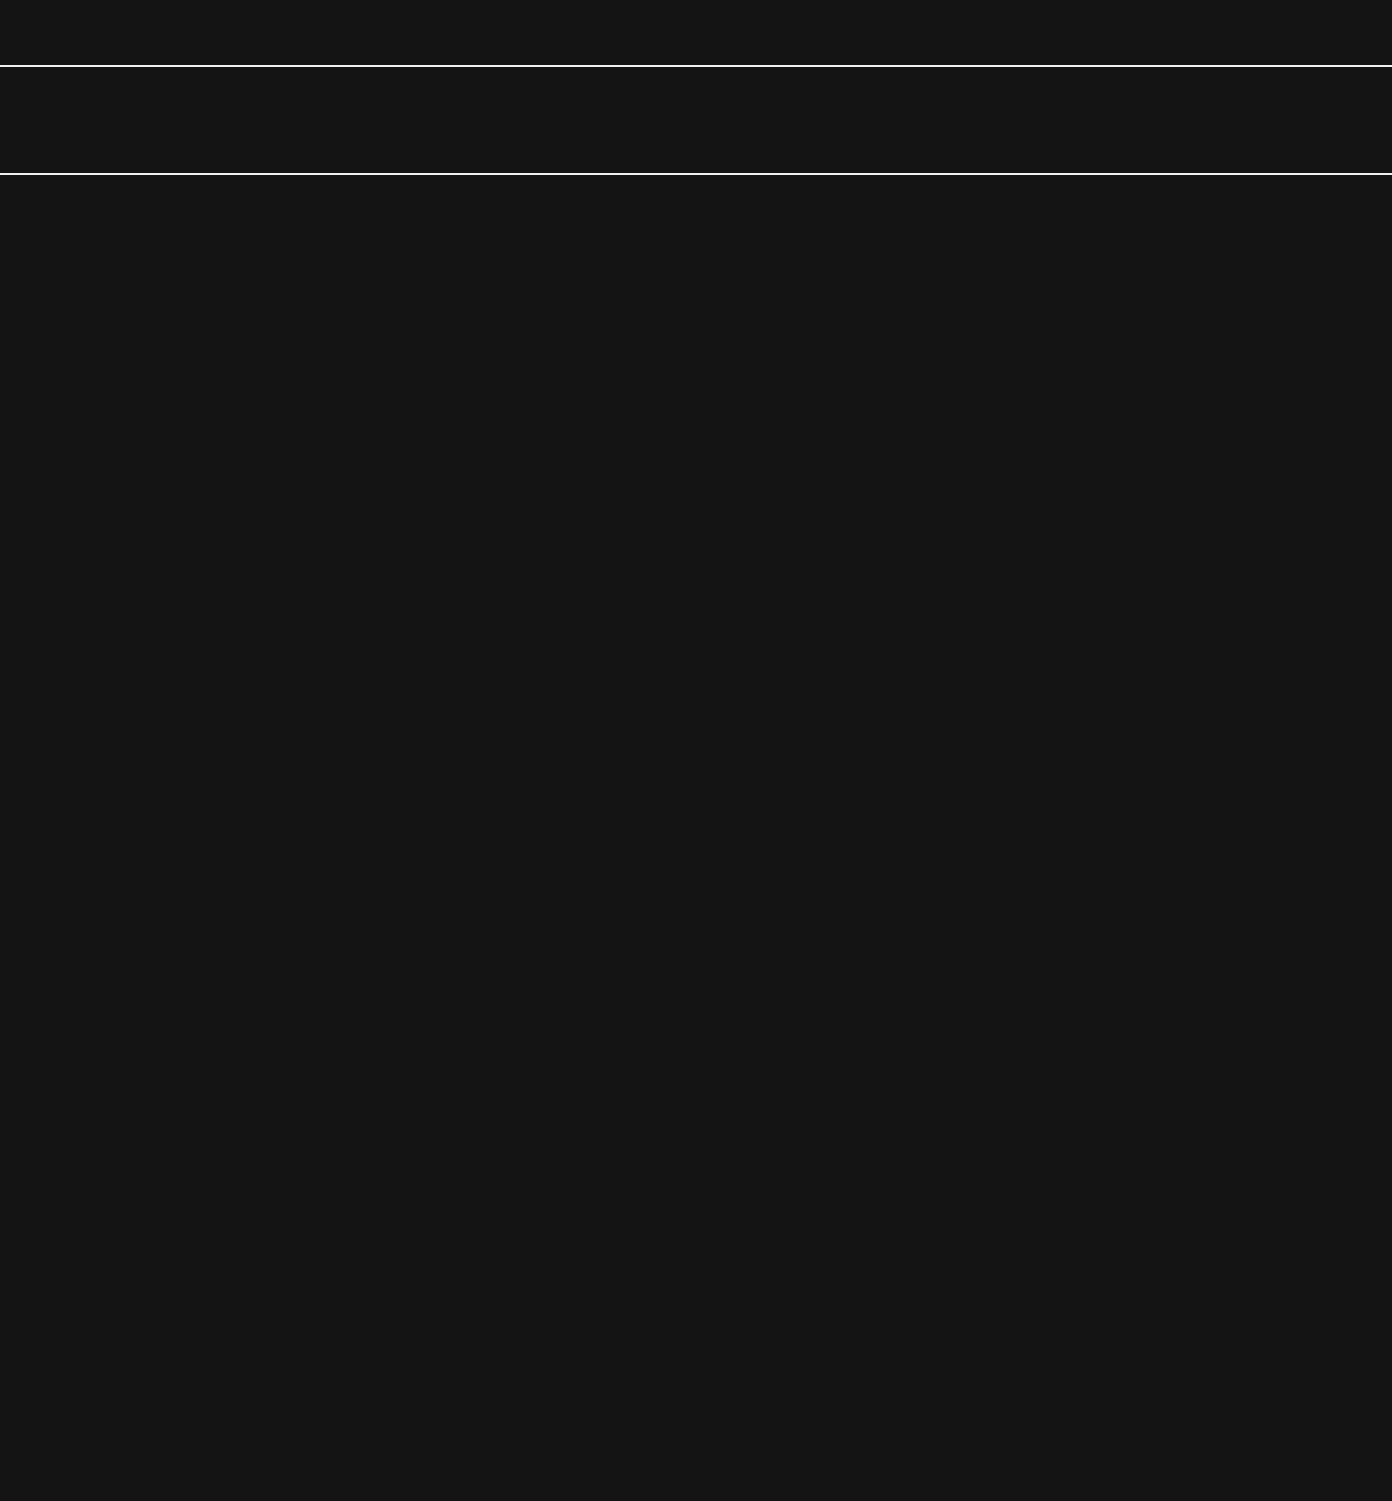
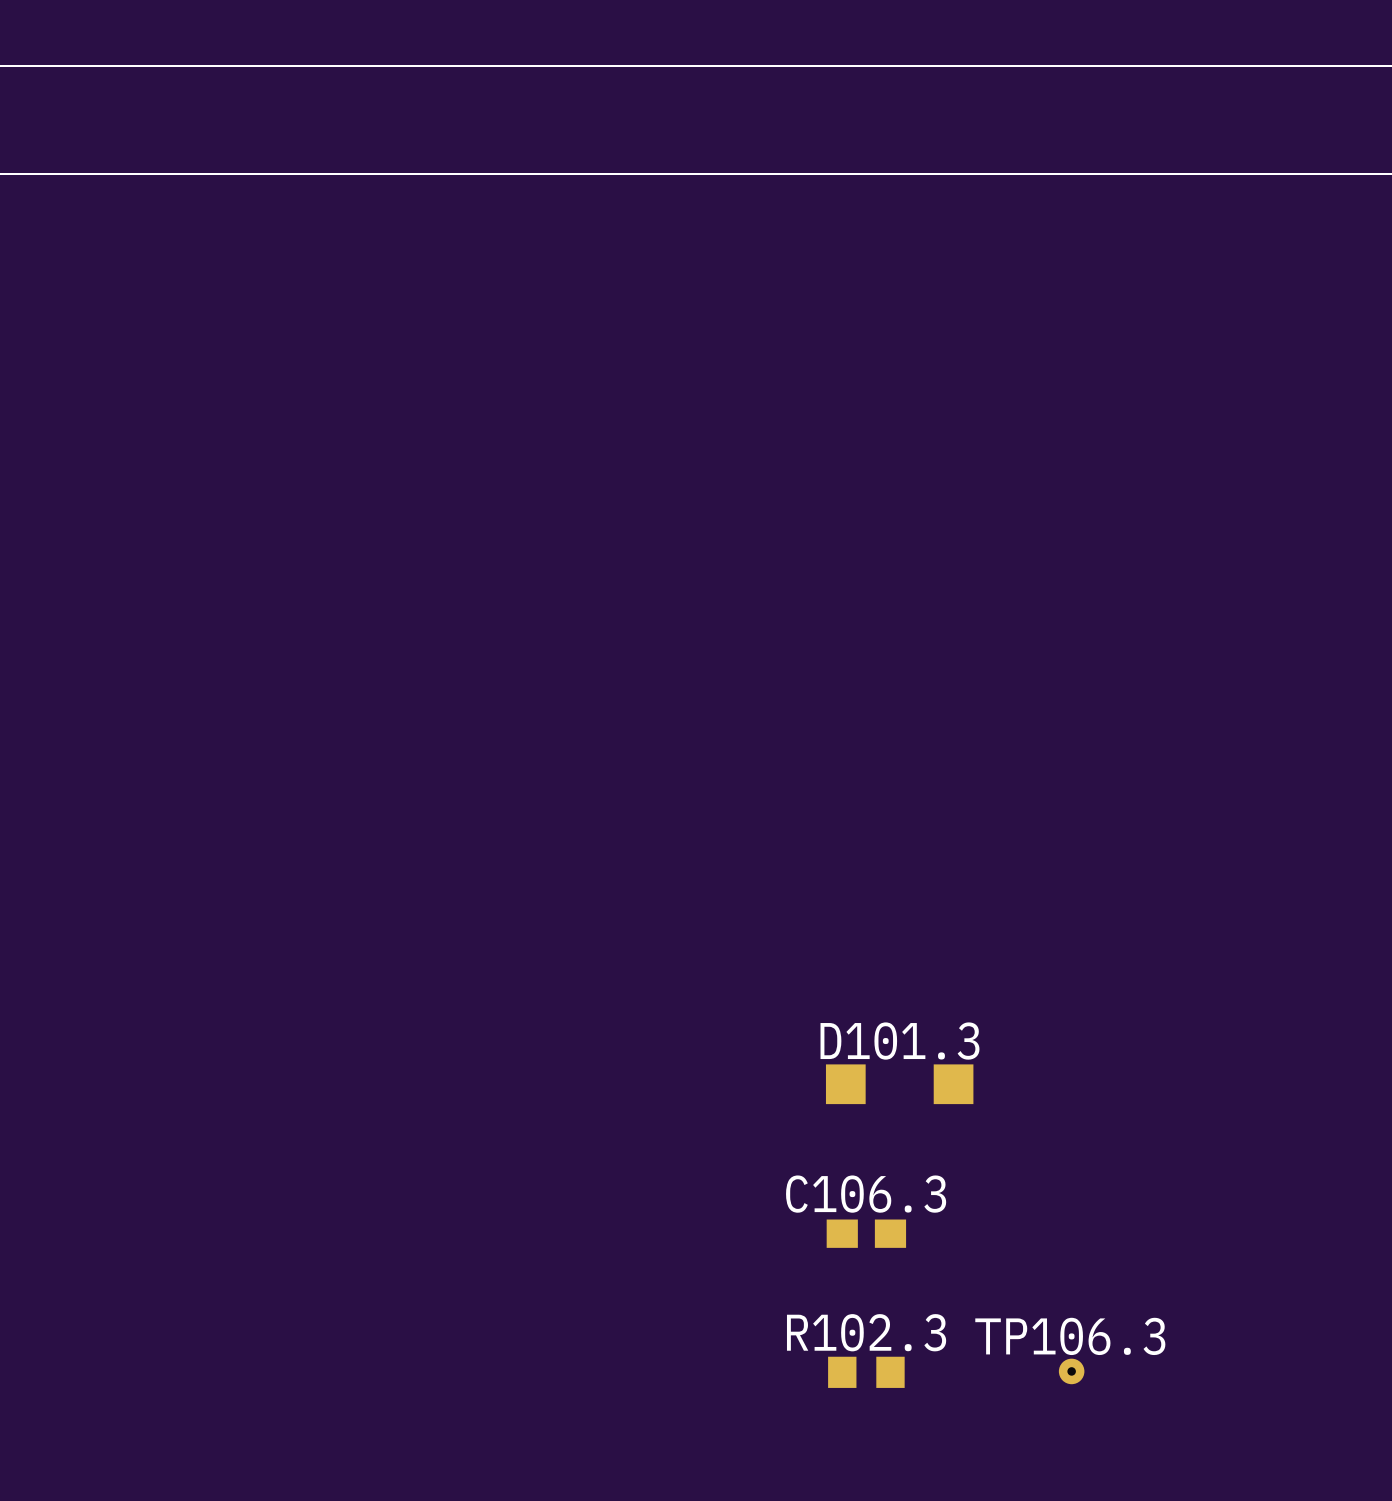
D101.3: none -> (899, 1084)
C106.3: none -> (866, 1233)
TP106.3: none -> (1071, 1371)
R102.3: none -> (866, 1372)

